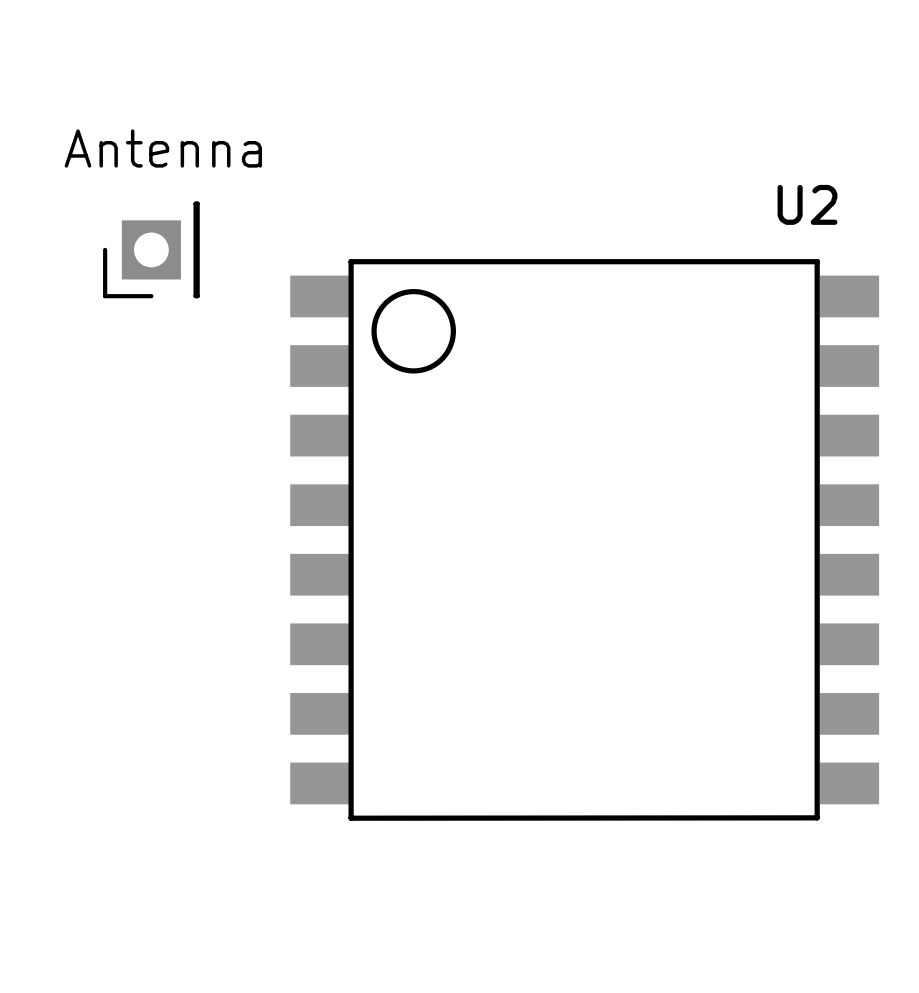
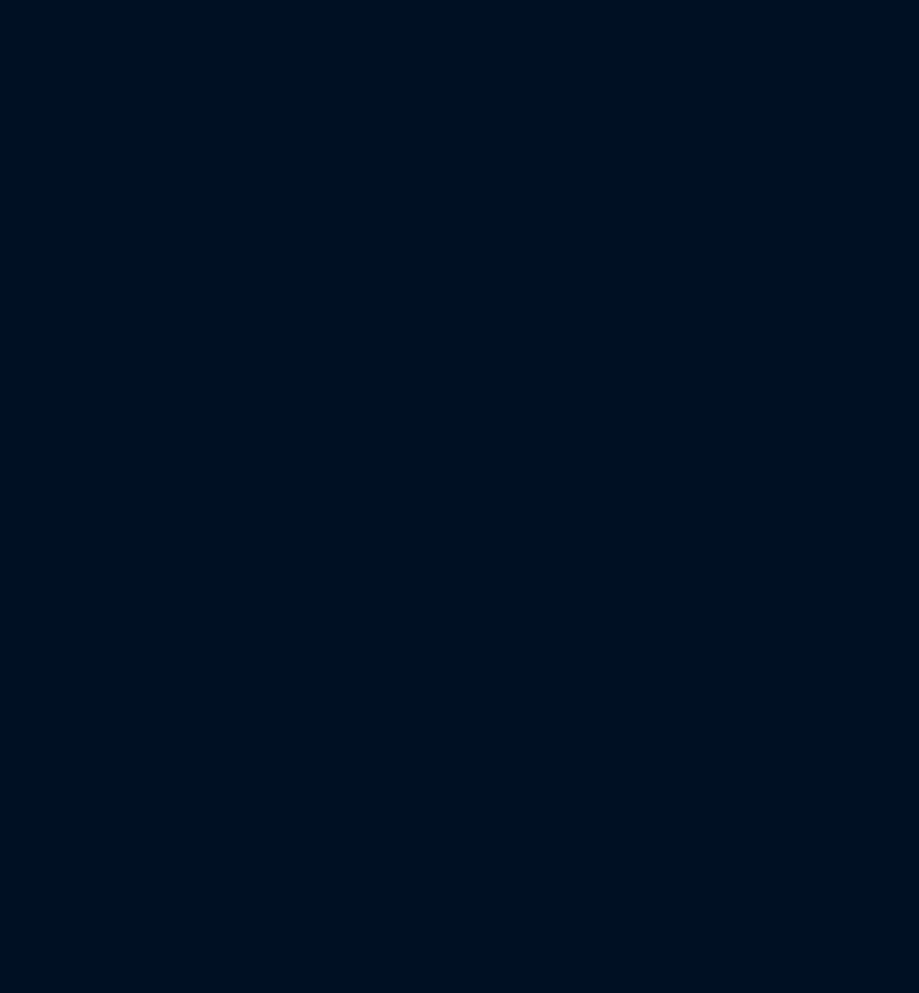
text: Antenna (163, 148) -> none
part: (151, 249) -> none
U2: (584, 539) -> none

